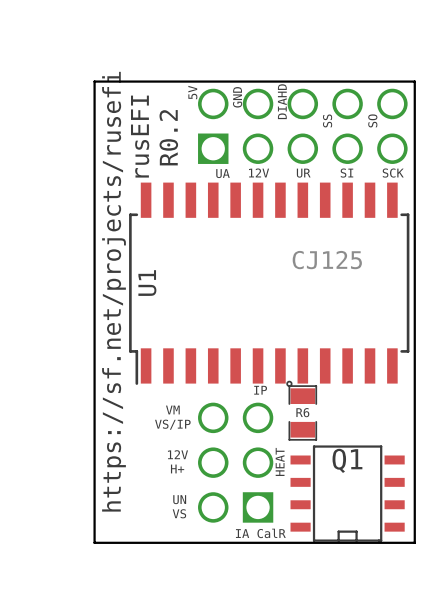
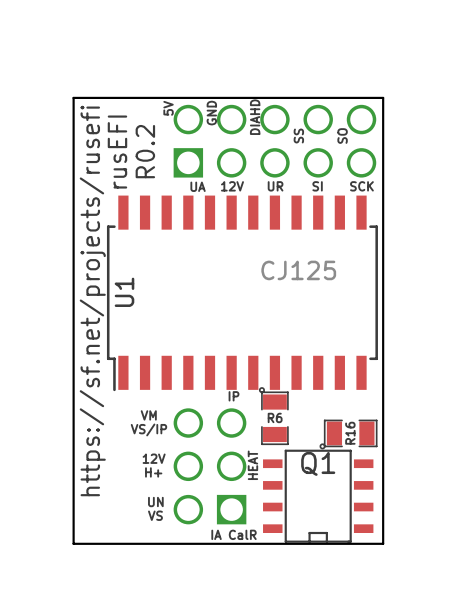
R16: none -> (348, 434)

